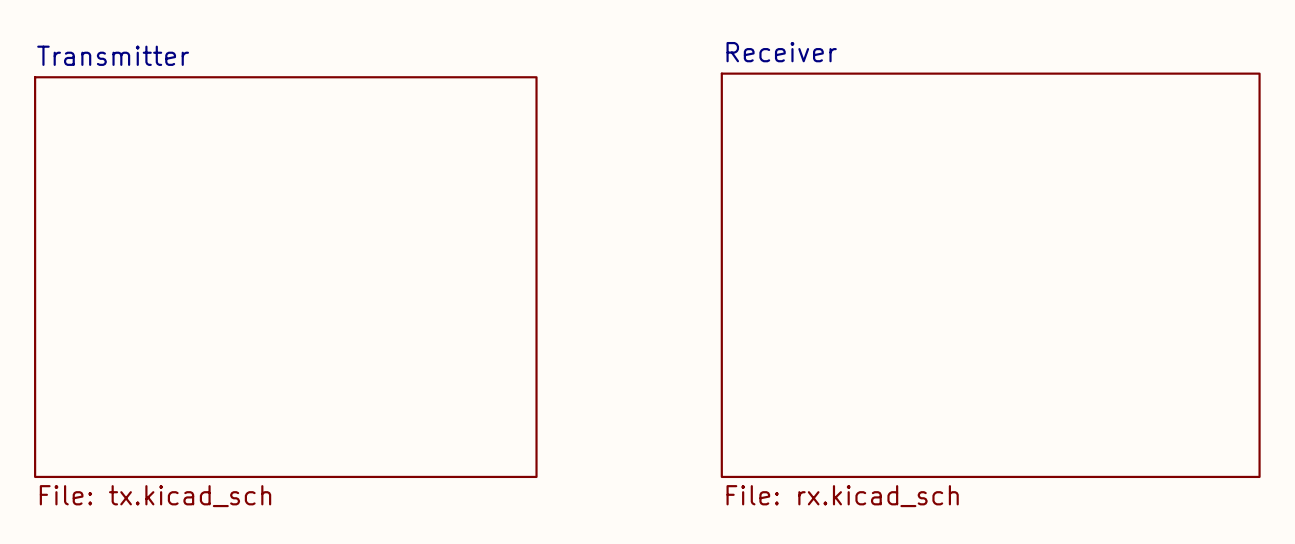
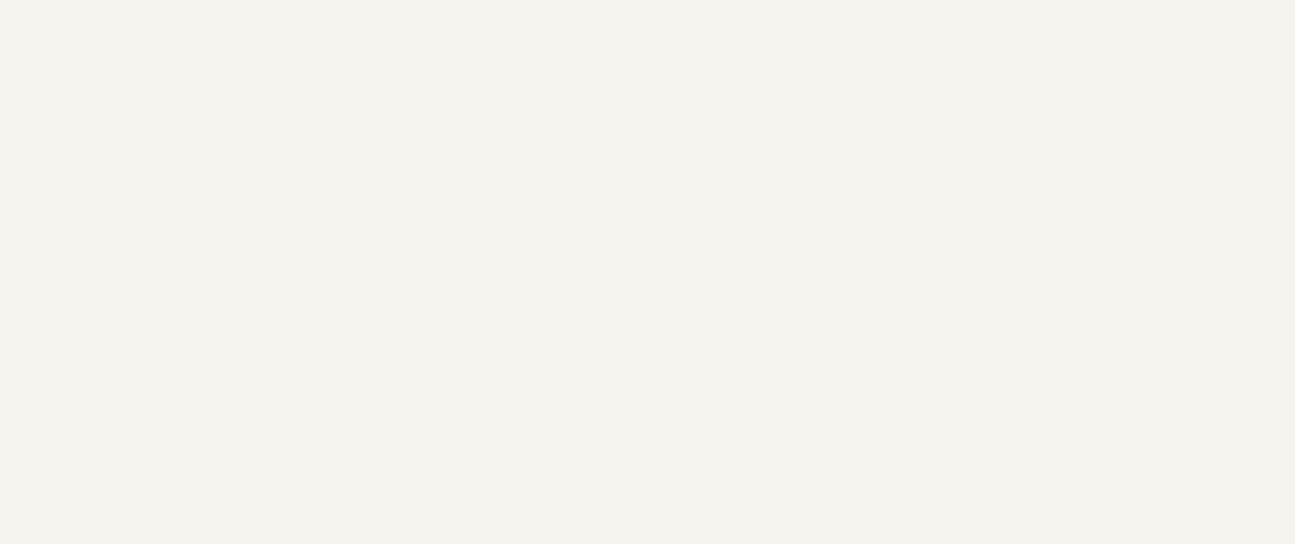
sheet Receiver: File: rx.kicad_sch (990, 275) -> none
sheet Transmitter: File: tx.kicad_sch (285, 277) -> none

